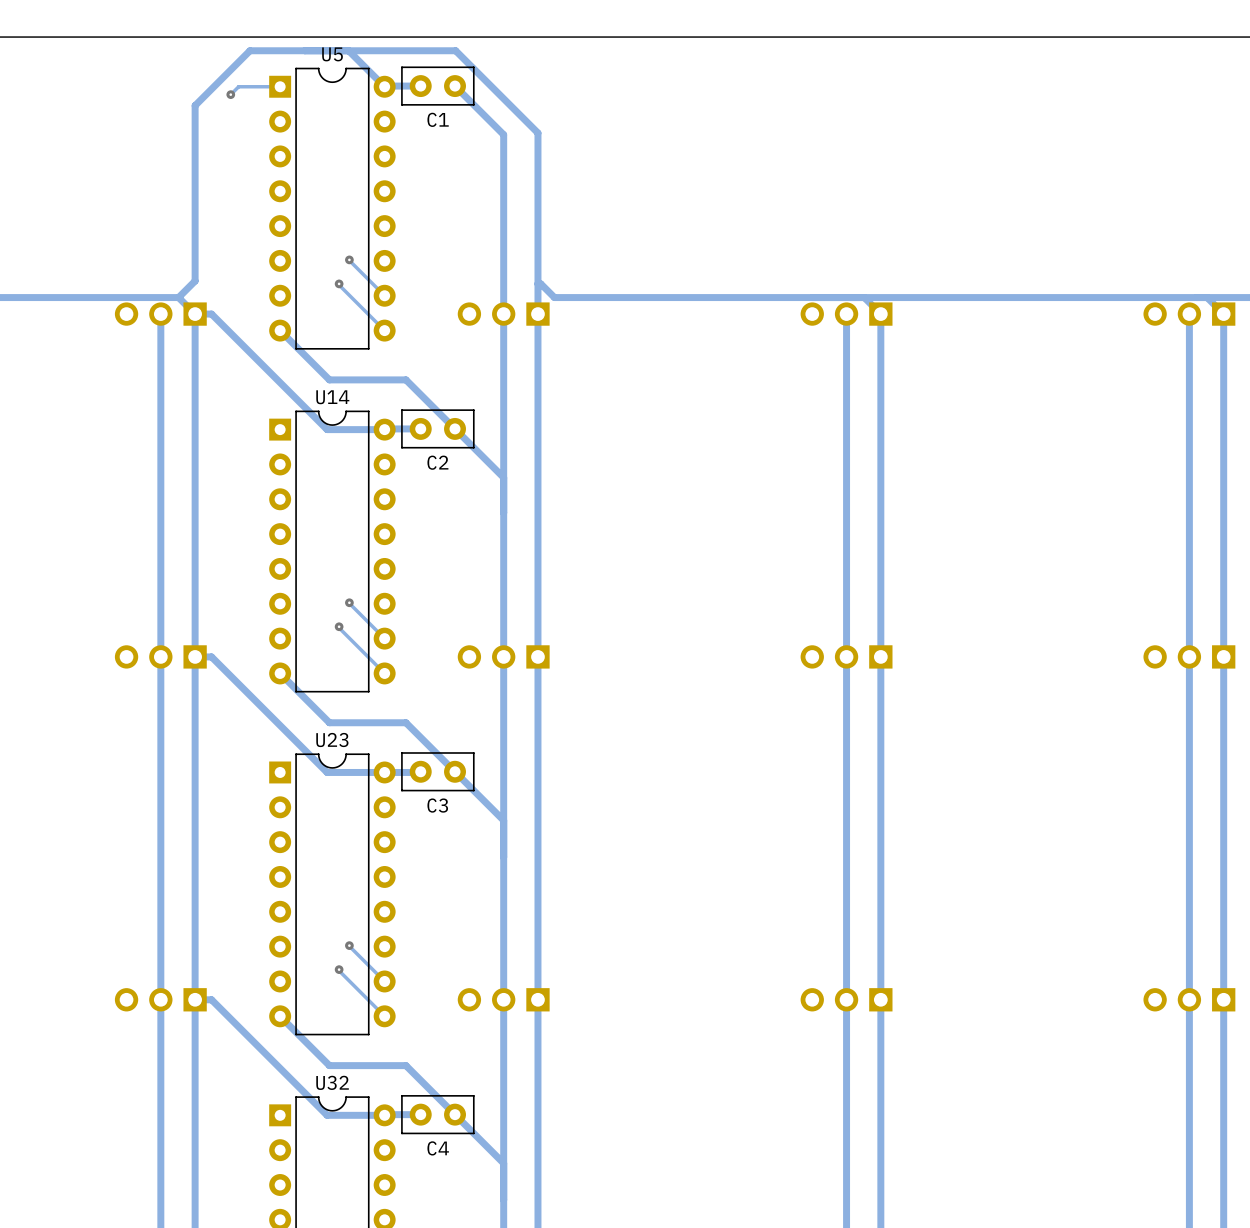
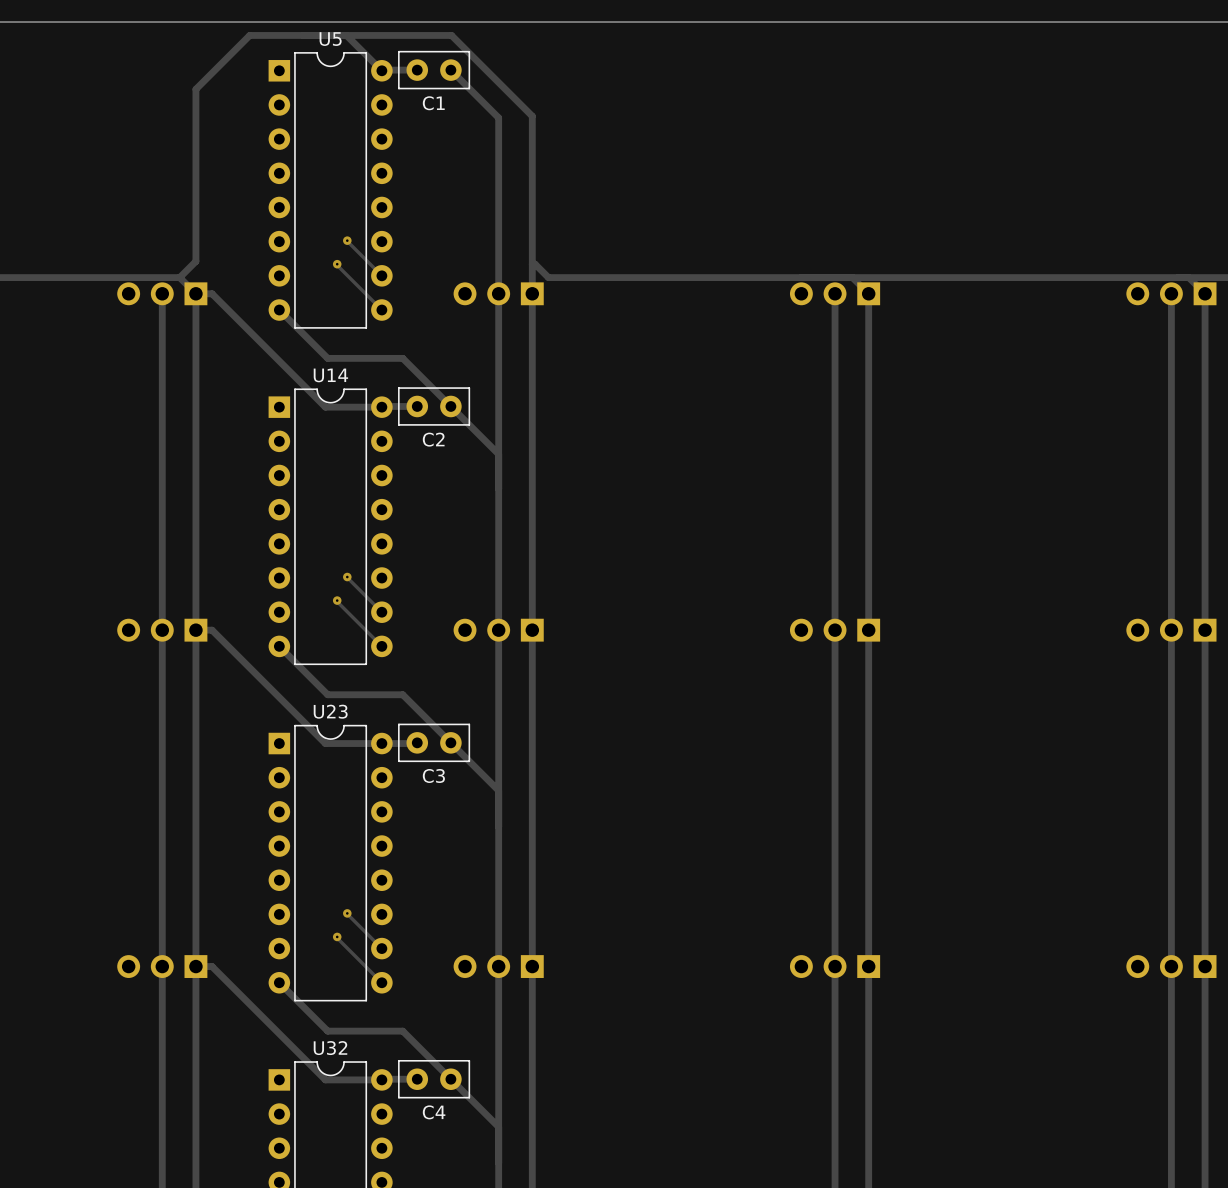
track: (280, 86) (238, 86) (230, 94) -> none
via: (230, 94) -> none

